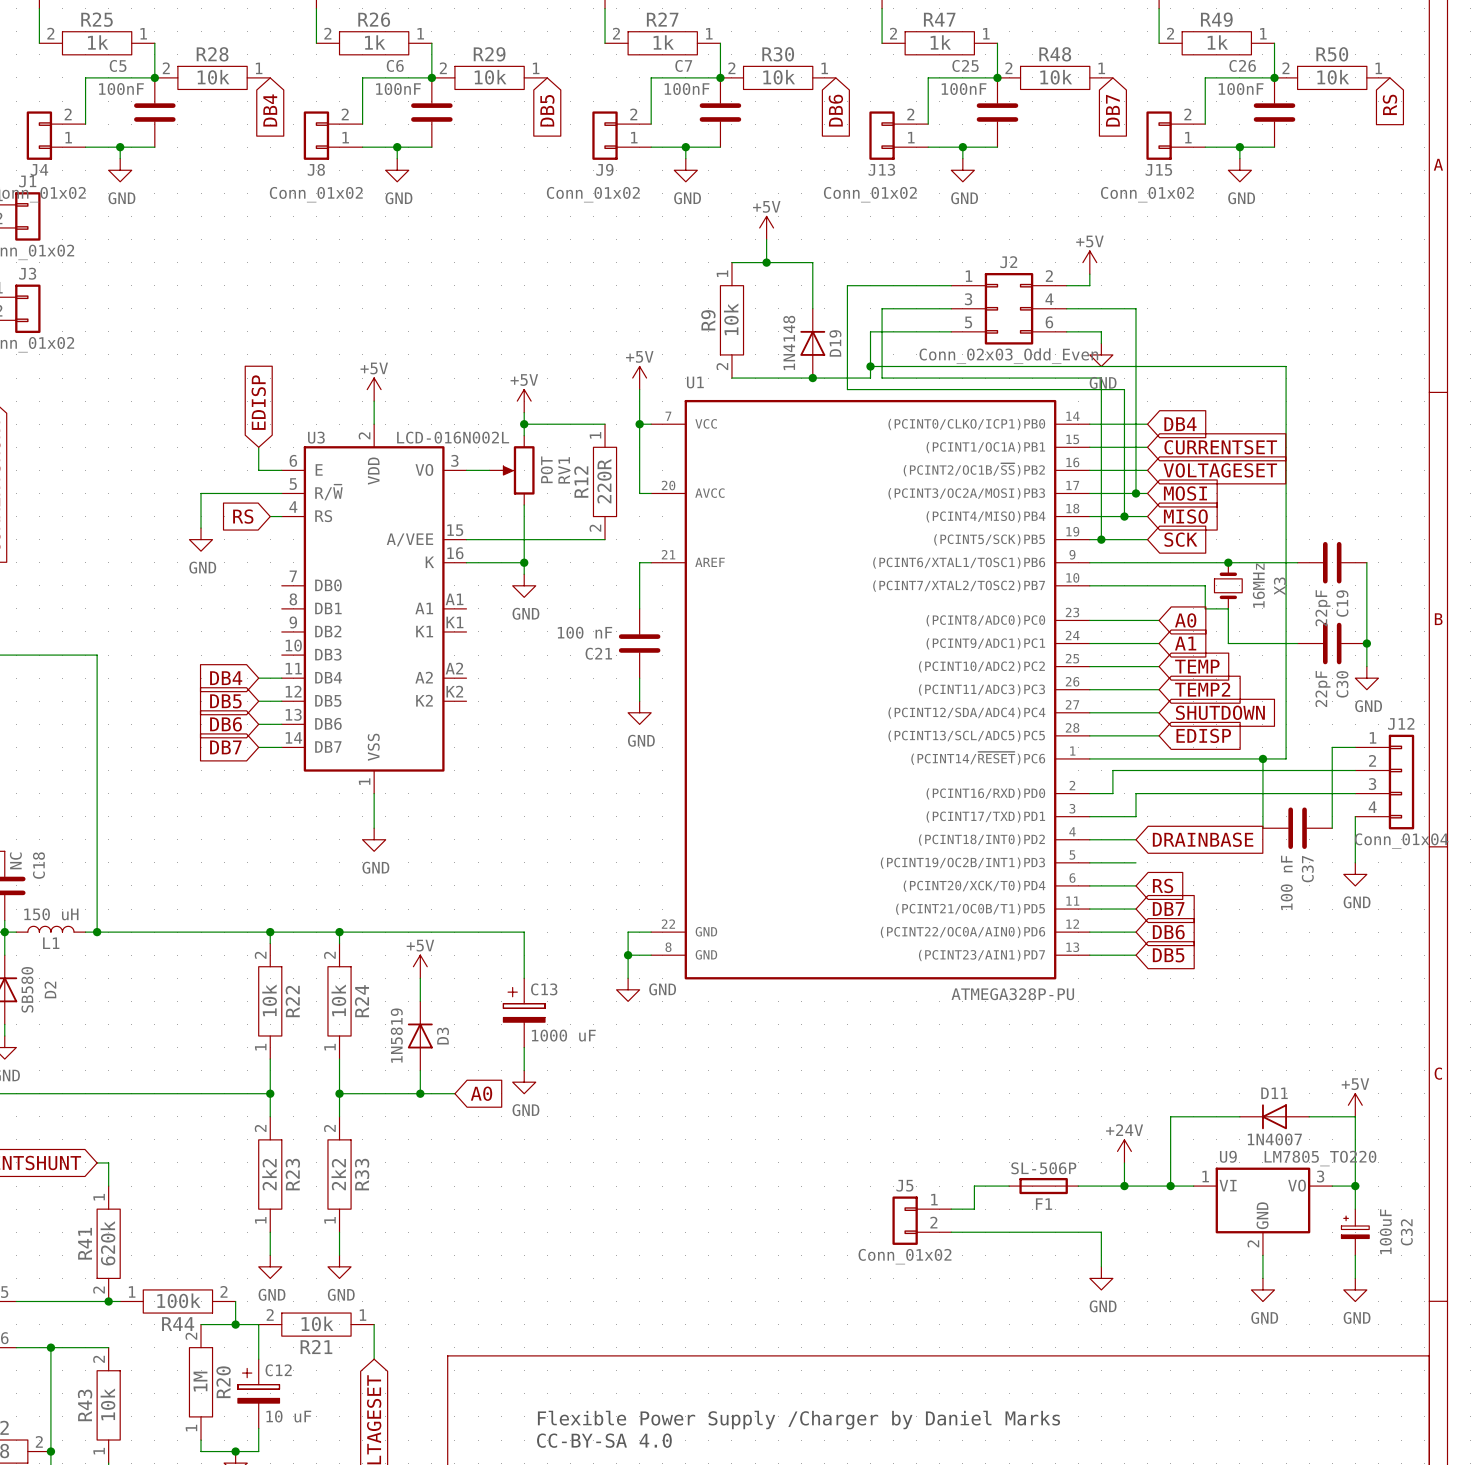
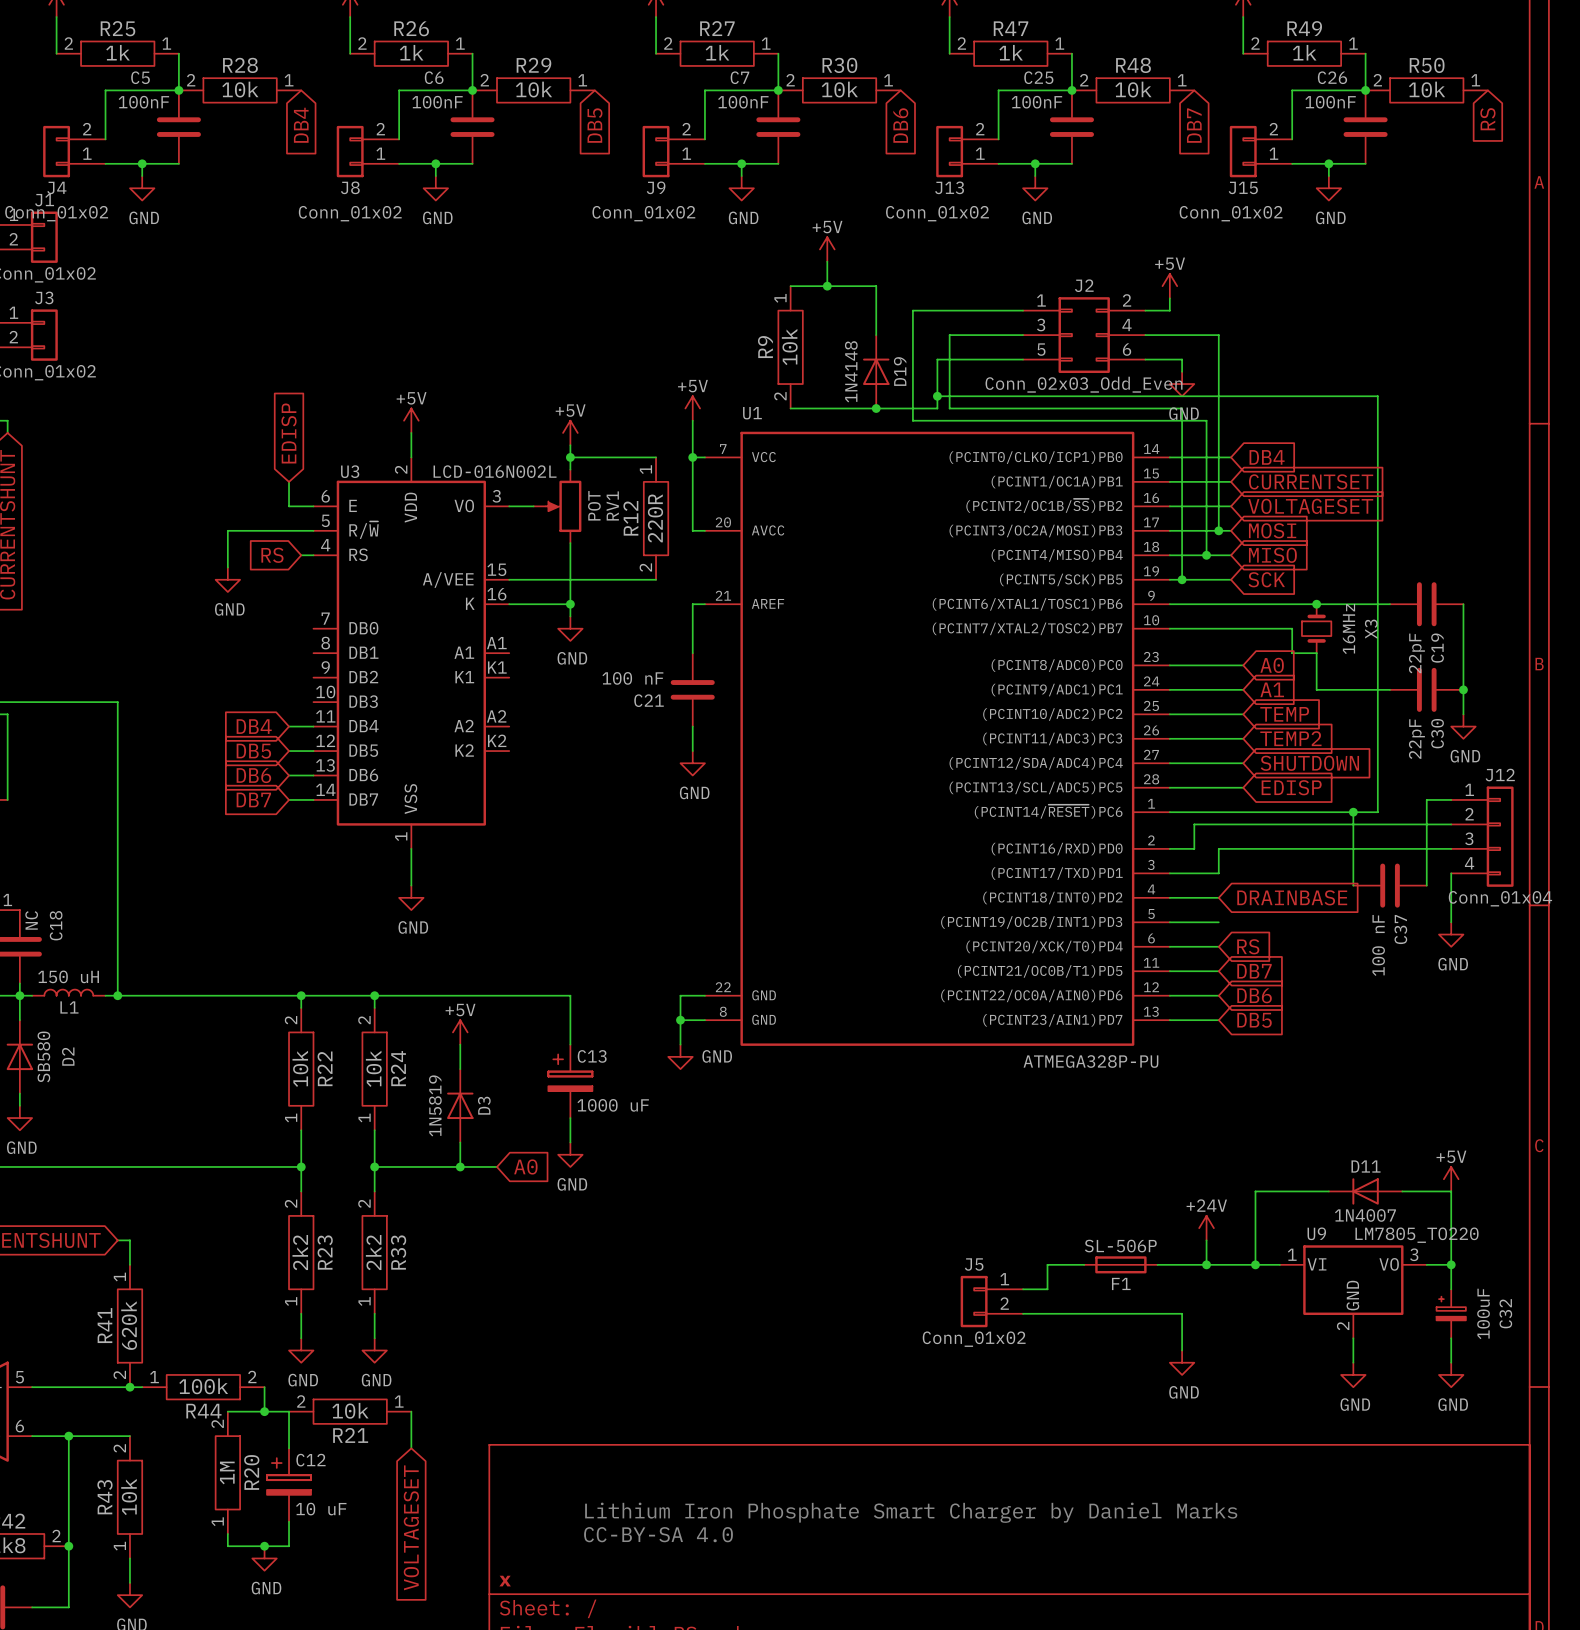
text: Flexible Power Supply /Charger by Daniel Marks (798, 1420) -> Lithium Iron Phosphate Smart Charger by Daniel Marks (911, 1512)

